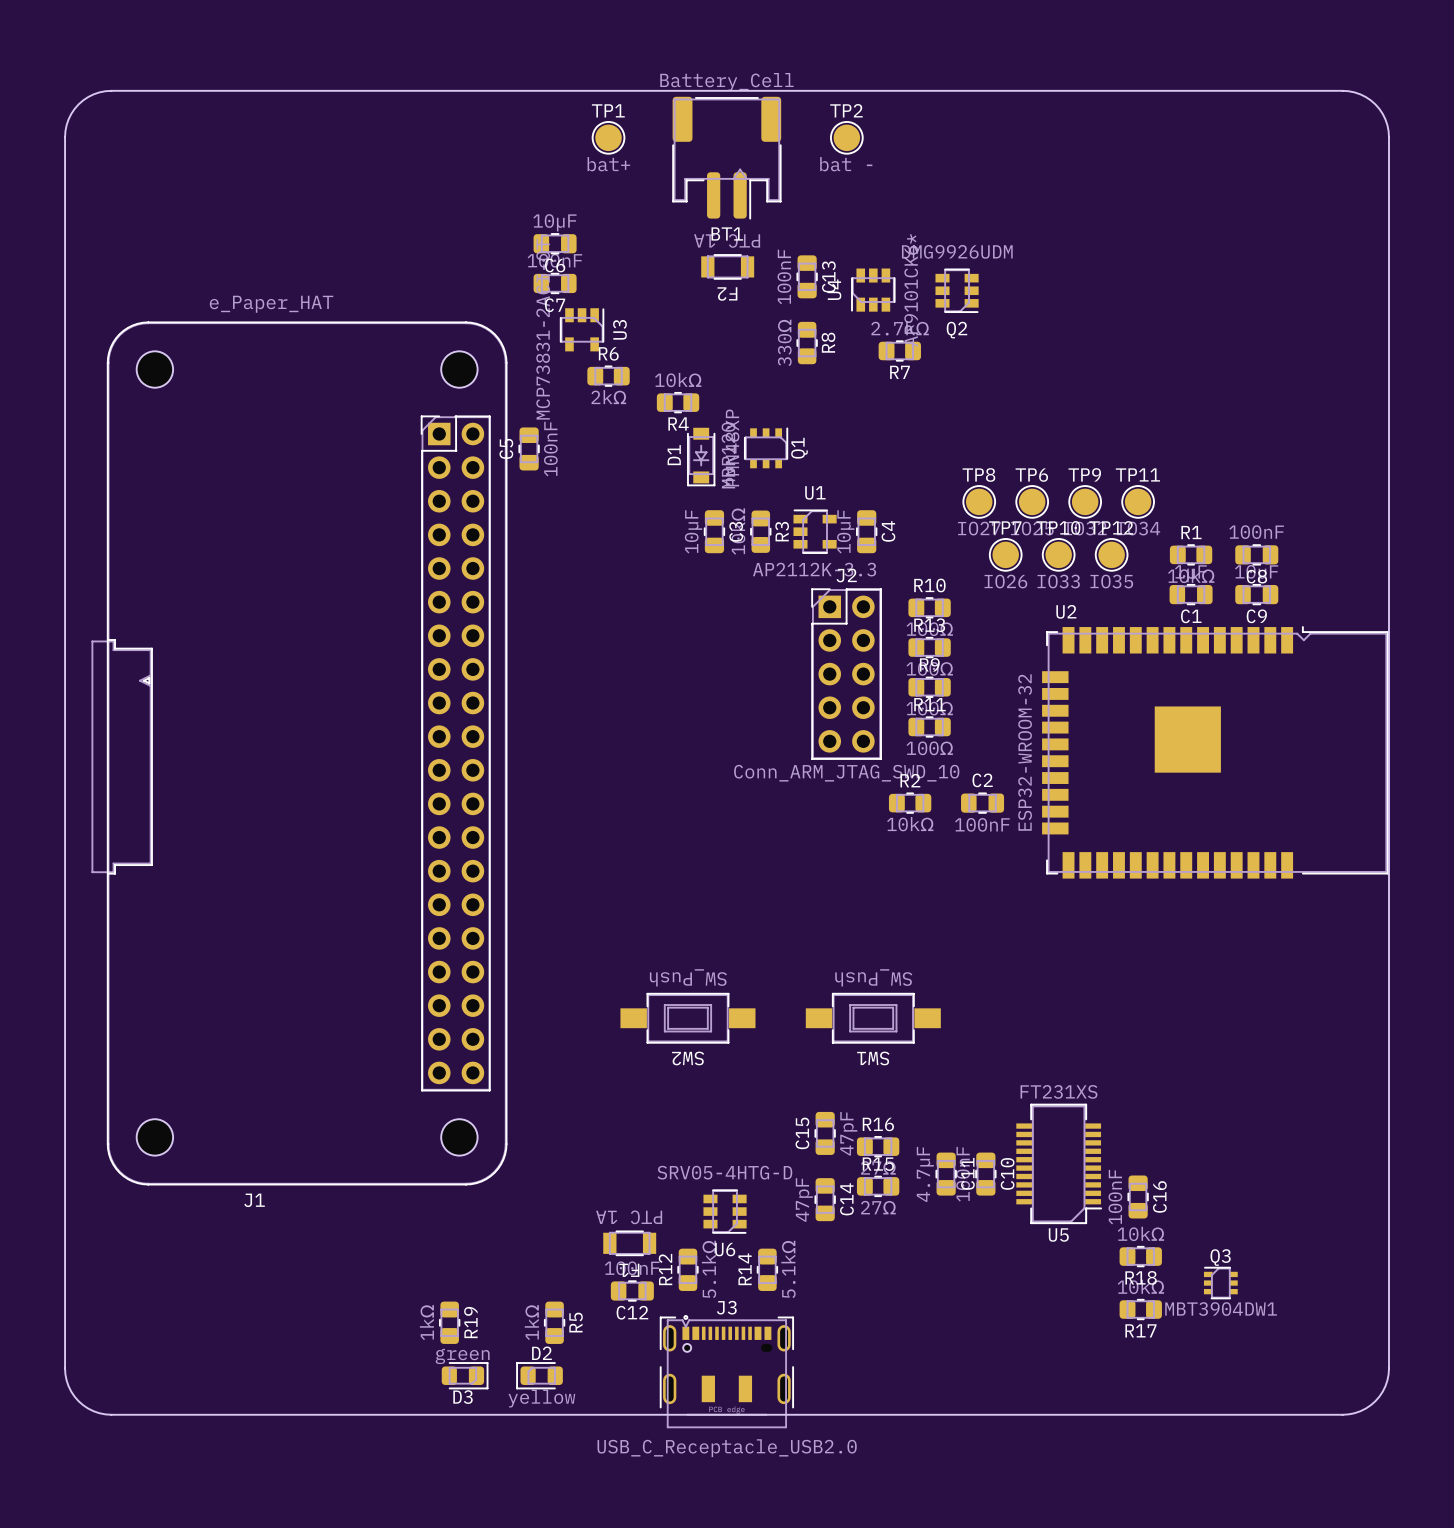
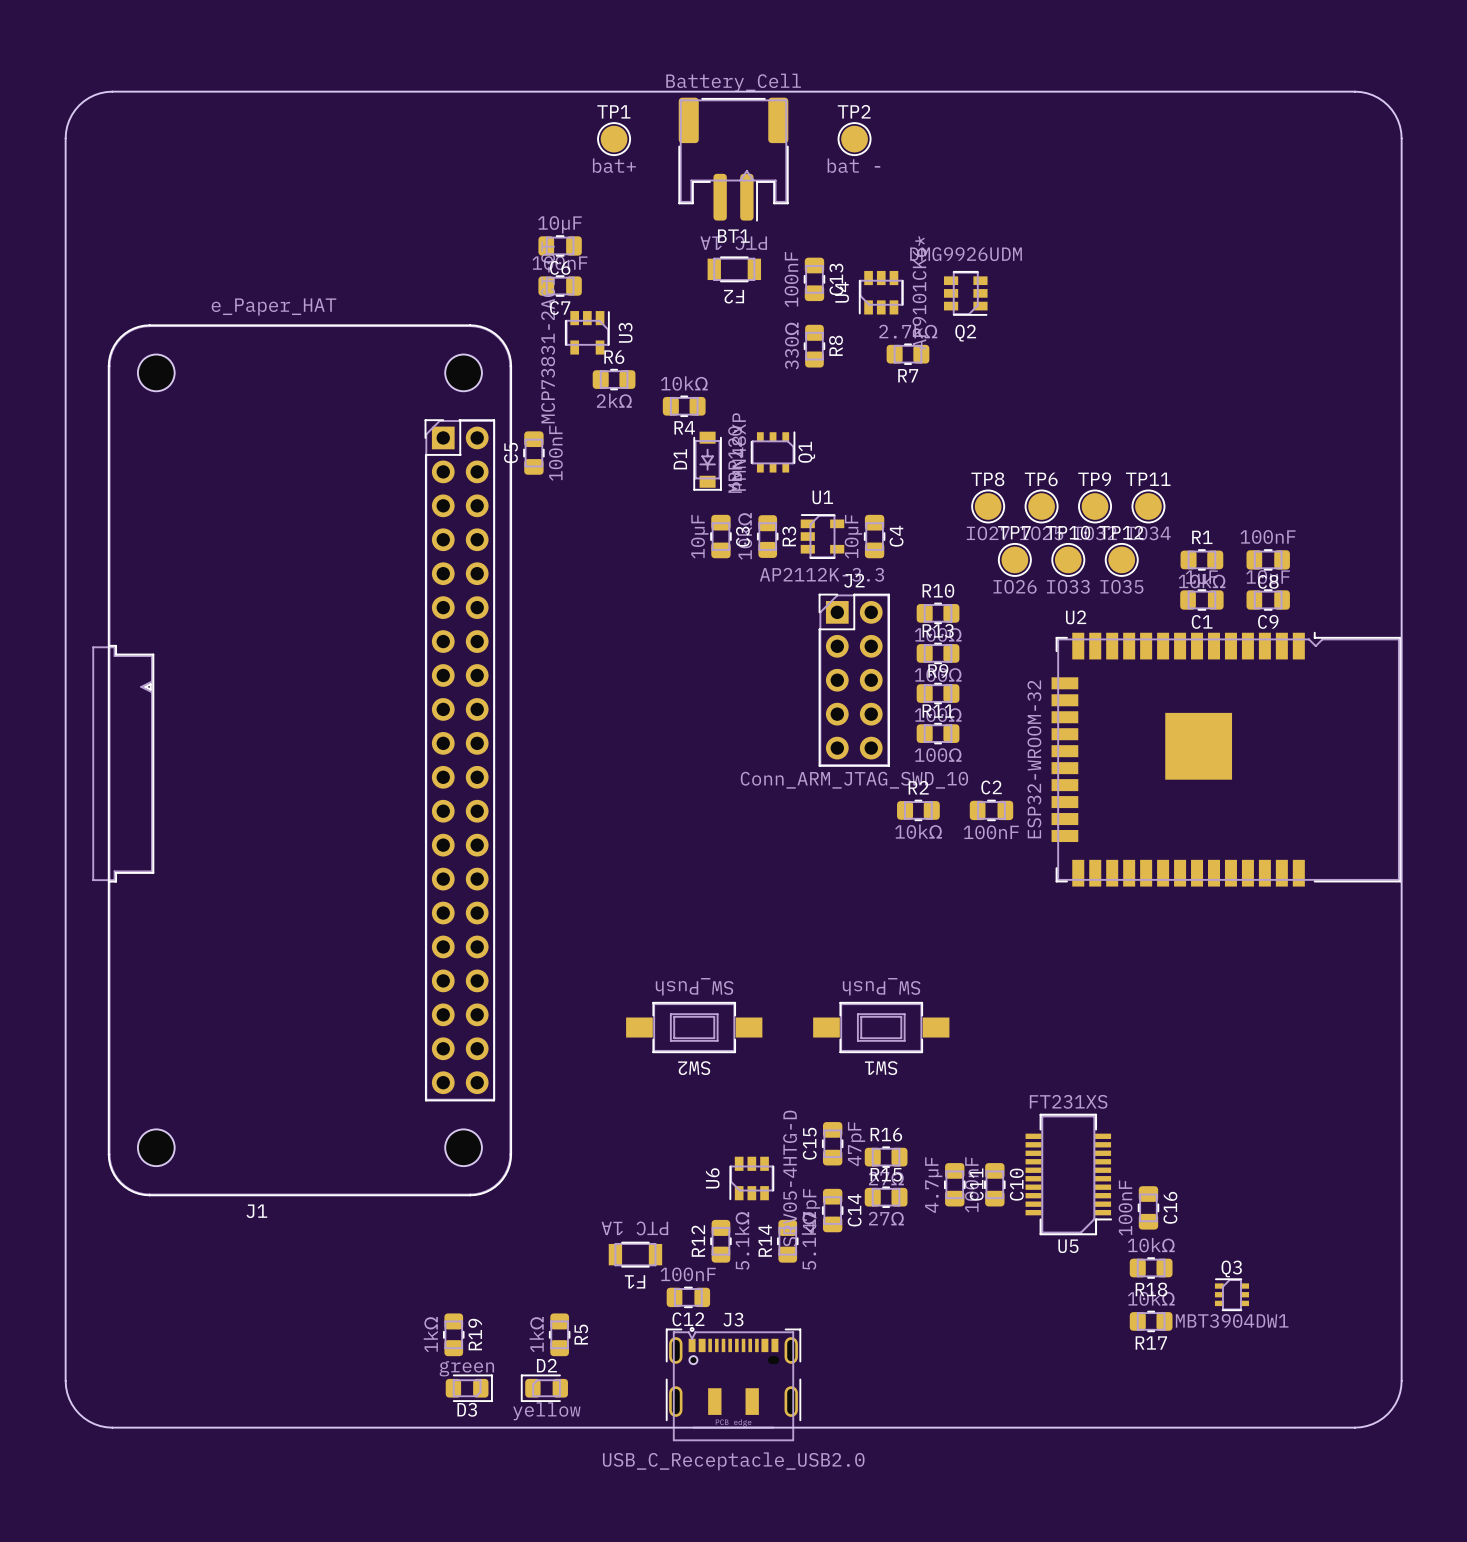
U6 rotation: 0° (725, 1211) -> 90° clockwise (751, 1178)
U6 position: (725, 1211) -> (751, 1178)
R12 position: (687, 1269) -> (720, 1241)
R14 position: (767, 1269) -> (787, 1241)
C12 position: (632, 1290) -> (688, 1297)

